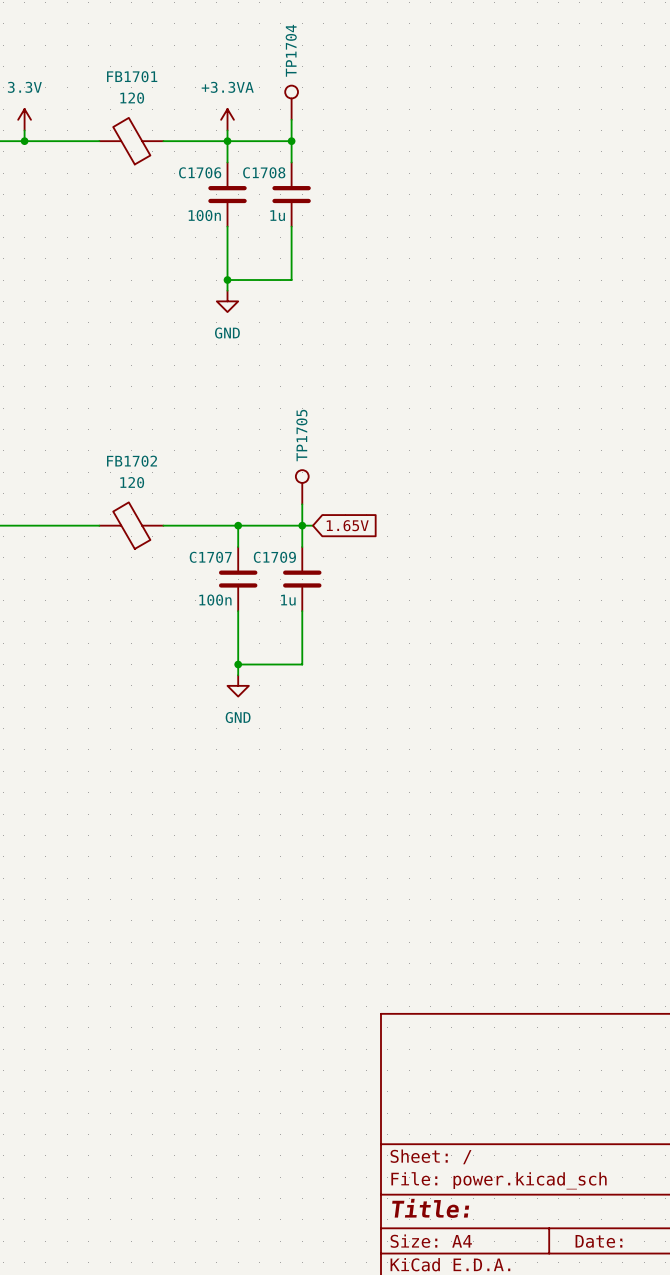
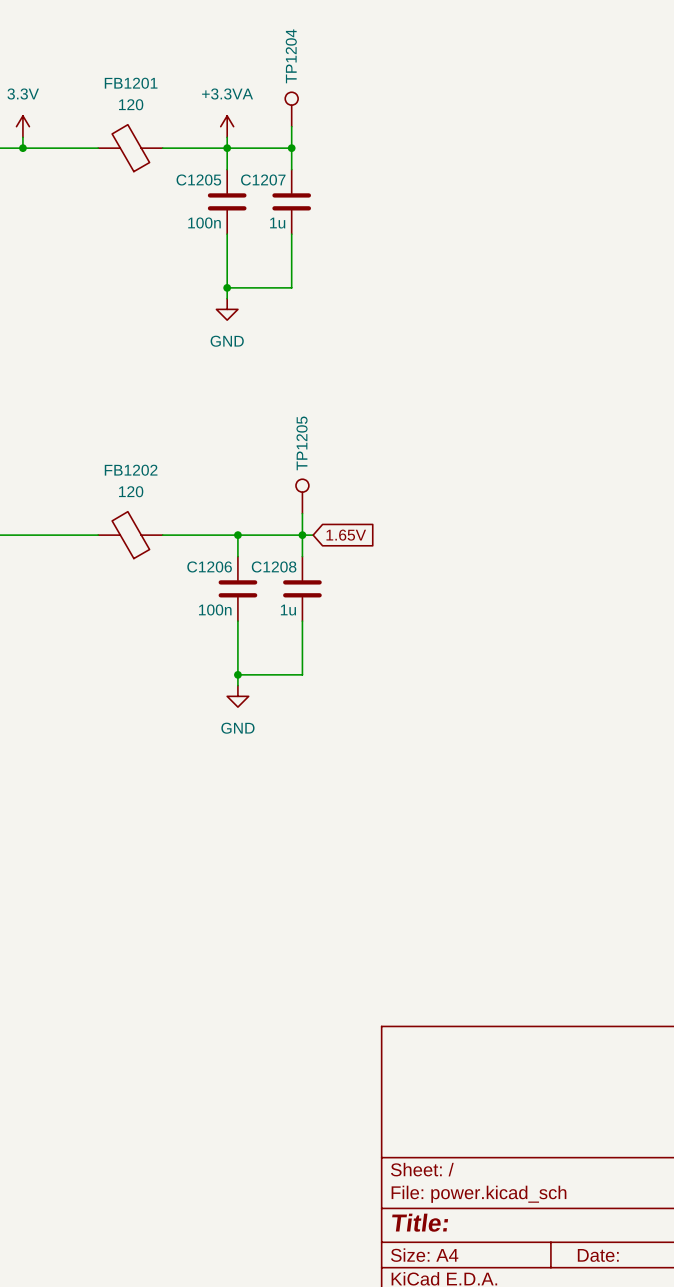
TP1704 name: TP1704 (291, 50) -> TP1204 (291, 56)
FB1701 name: FB1701 (132, 76) -> FB1201 (131, 83)
C1706 name: C1706 (200, 172) -> C1205 (198, 179)
C1708 name: C1708 (264, 172) -> C1207 (263, 179)
TP1705 name: TP1705 (301, 435) -> TP1205 (302, 443)
FB1702 name: FB1702 (132, 461) -> FB1202 (131, 470)
C1707 name: C1707 (210, 557) -> C1206 (209, 566)
C1709 name: C1709 (274, 557) -> C1208 (274, 566)

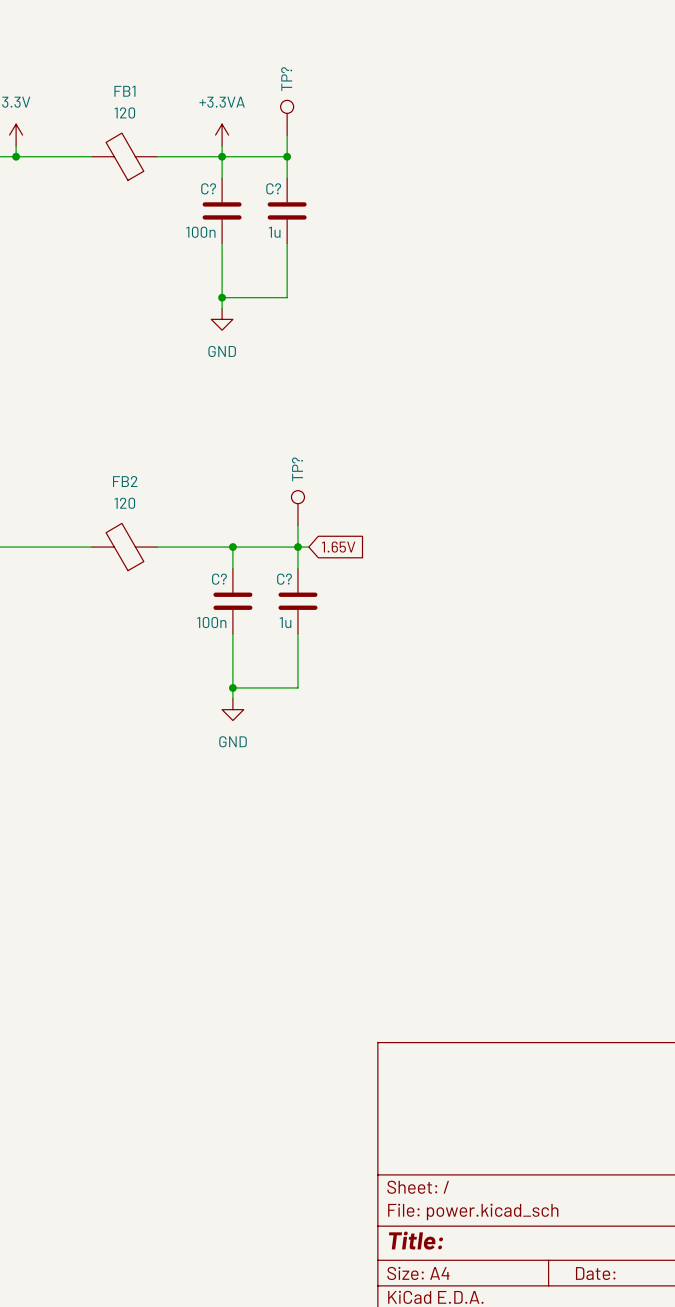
TP1204 name: TP1204 (291, 56) -> TP? (286, 79)
FB1201 name: FB1201 (131, 83) -> FB1 (124, 91)
C1205 name: C1205 (198, 179) -> C? (208, 188)
C1207 name: C1207 (263, 179) -> C? (273, 188)
TP1205 name: TP1205 (302, 443) -> TP? (297, 469)
FB1202 name: FB1202 (131, 470) -> FB2 (125, 481)
C1206 name: C1206 (209, 566) -> C? (219, 579)
C1208 name: C1208 (274, 566) -> C? (284, 579)

